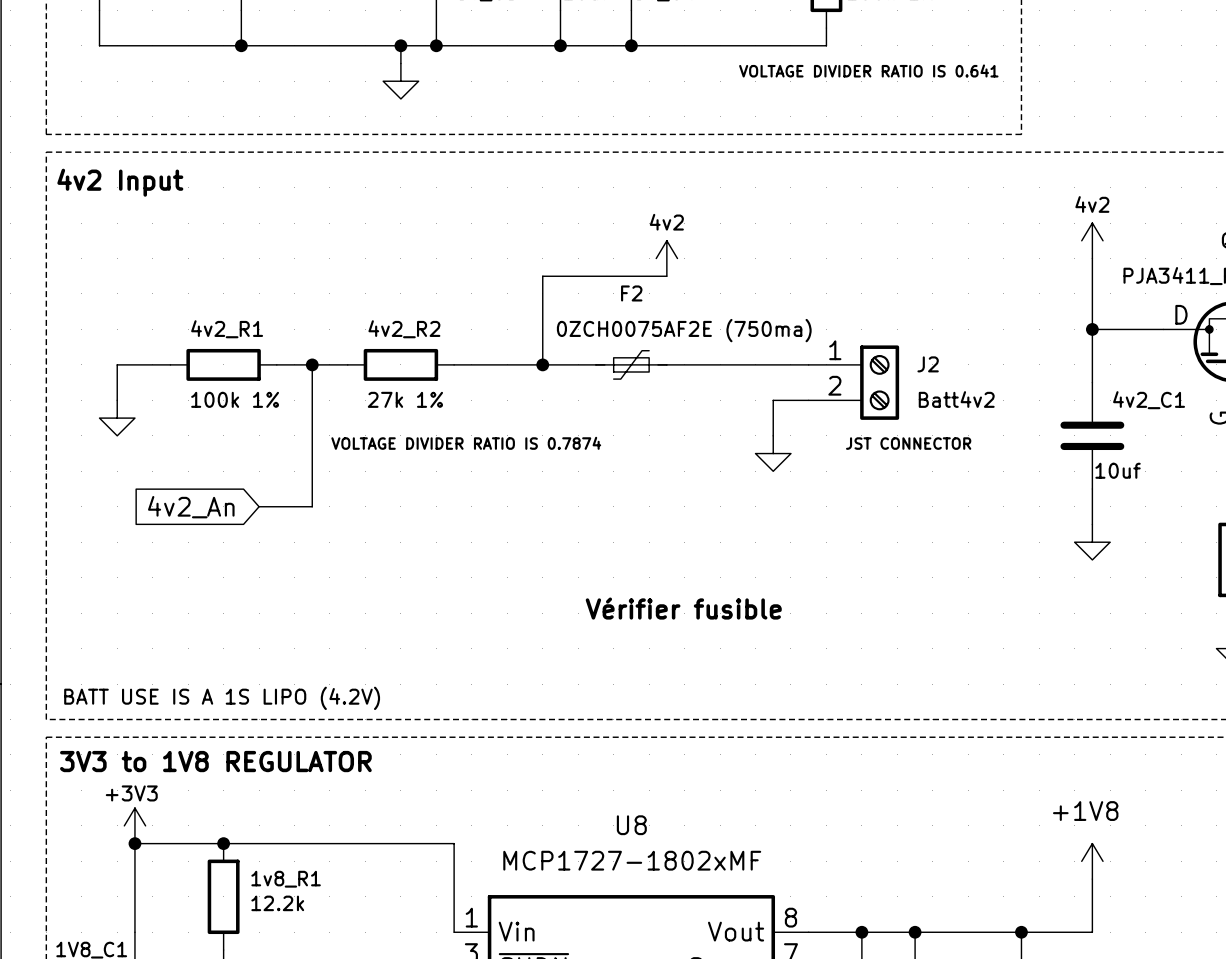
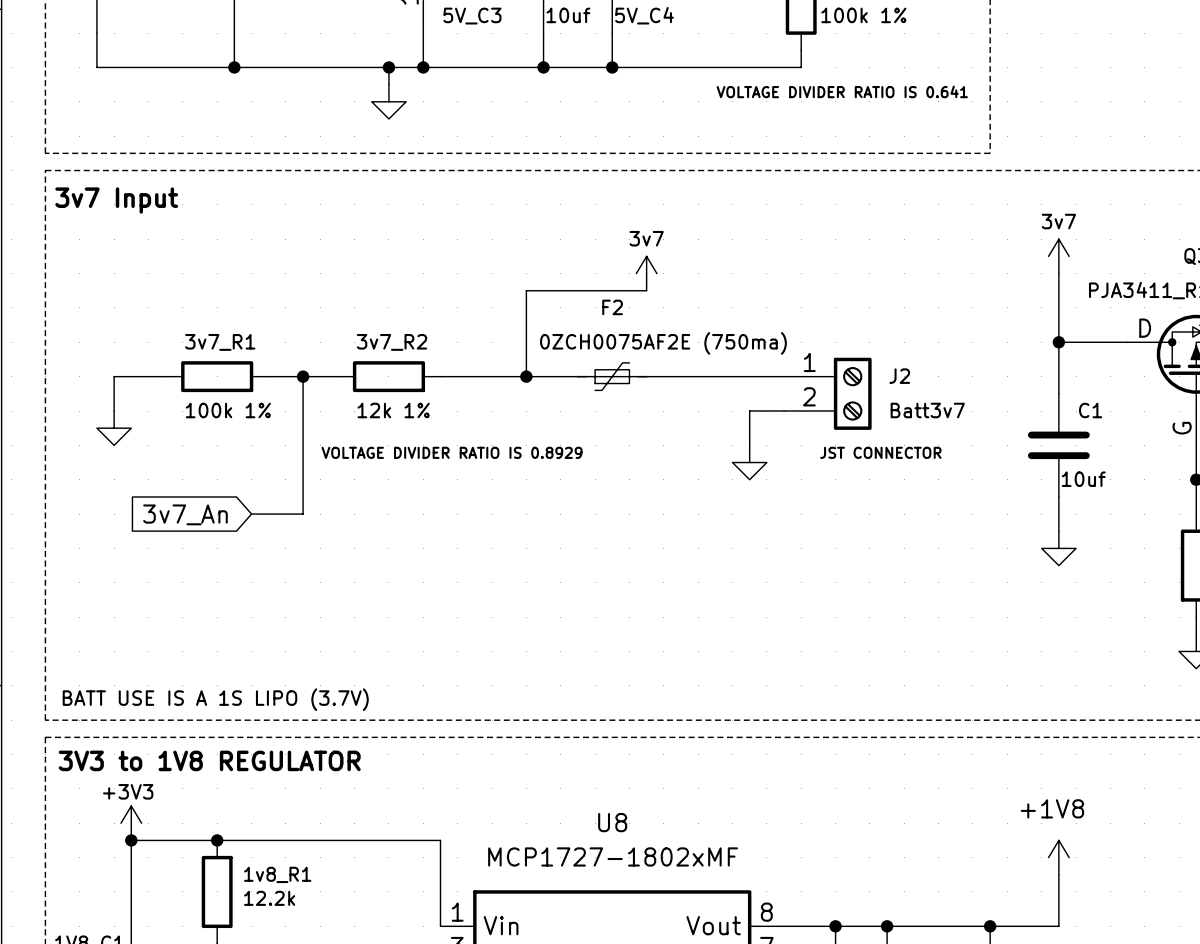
text: 4v2 Input (120, 182) -> 3v7 Input (116, 200)
power symbol: 4v2 (1092, 240) -> 3v7 (1058, 256)
power symbol: 4v2 (666, 258) -> 3v7 (646, 273)
4v2_R1 name: 4v2_R1 (227, 329) -> 3v7_R1 (220, 342)
4v2_R2 name: 4v2_R2 (404, 329) -> 3v7_R2 (392, 342)
4v2_R2 value: 27k 1% (405, 399) -> 12k 1% (393, 410)
J2 value: Batt4v2 (956, 399) -> Batt3v7 (927, 410)
4v2_C1 name: 4v2_C1 (1149, 400) -> C1 (1090, 410)
text: VOLTAGE DIVIDER RATIO IS 0.7874 (466, 443) -> VOLTAGE DIVIDER RATIO IS 0.8929 (452, 452)
global label: 4v2_An (191, 507) -> 3v7_An (185, 514)
text: Vérifier fusible (683, 608) -> none
text: BATT USE IS A 1S LIPO (4.2V) (222, 698) -> BATT USE IS A 1S LIPO (3.7V) (215, 699)

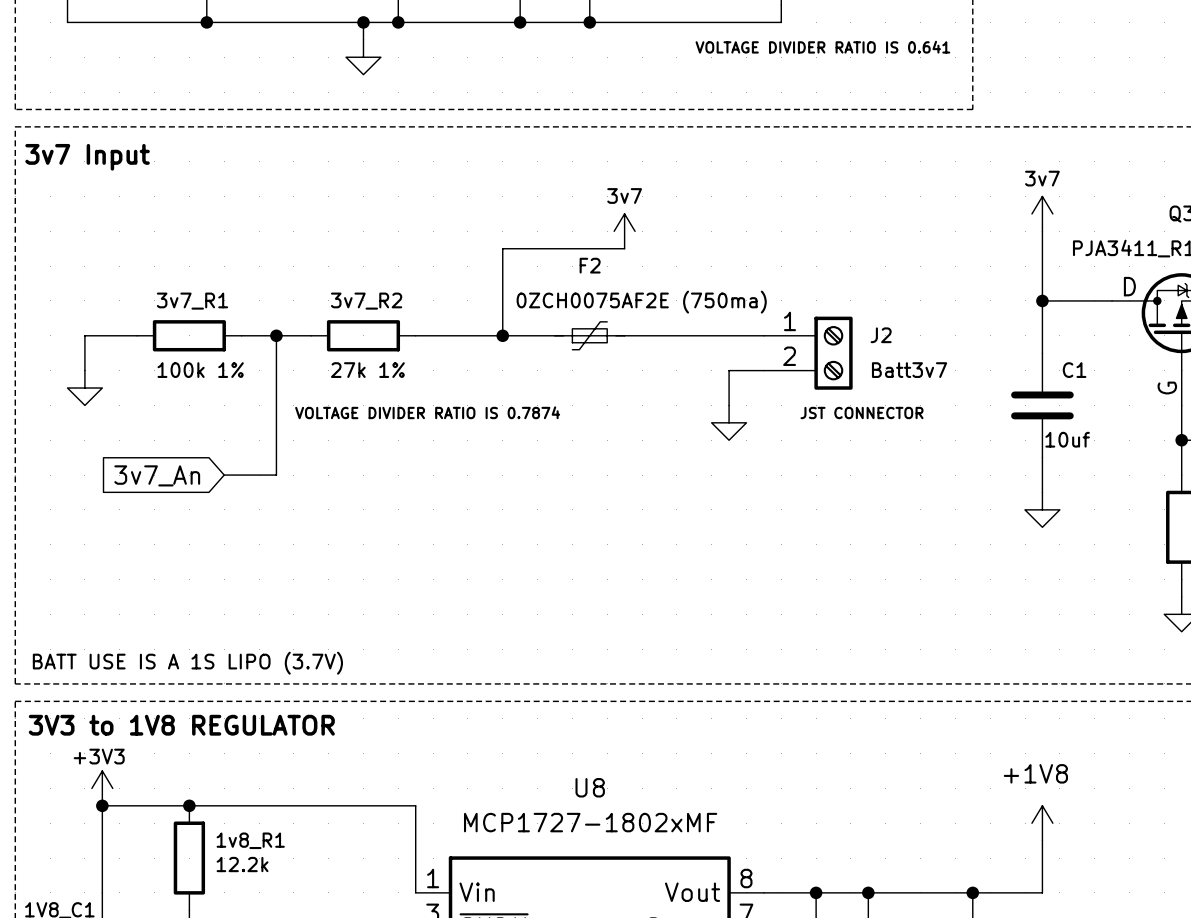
3v7_R2 value: 12k 1% (393, 410) -> 27k 1% (367, 370)
text: VOLTAGE DIVIDER RATIO IS 0.8929 (452, 452) -> VOLTAGE DIVIDER RATIO IS 0.7874 (427, 412)

